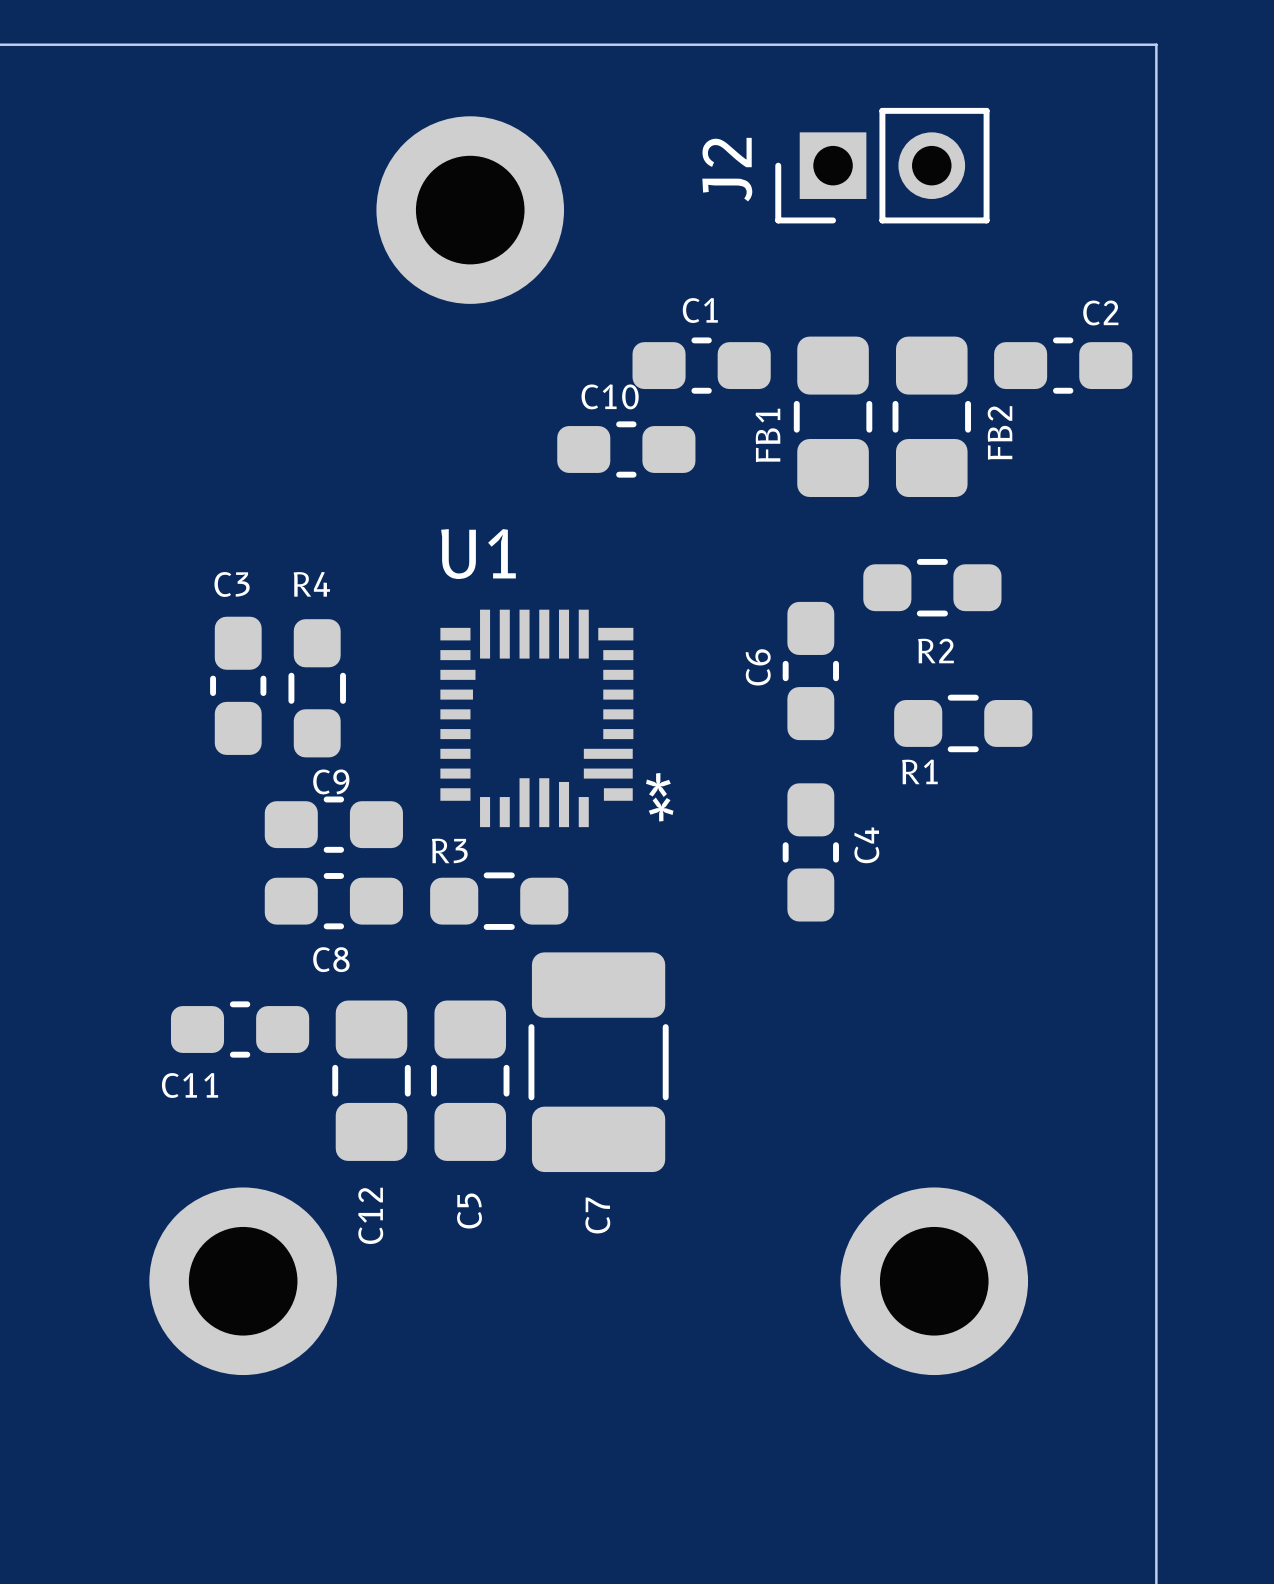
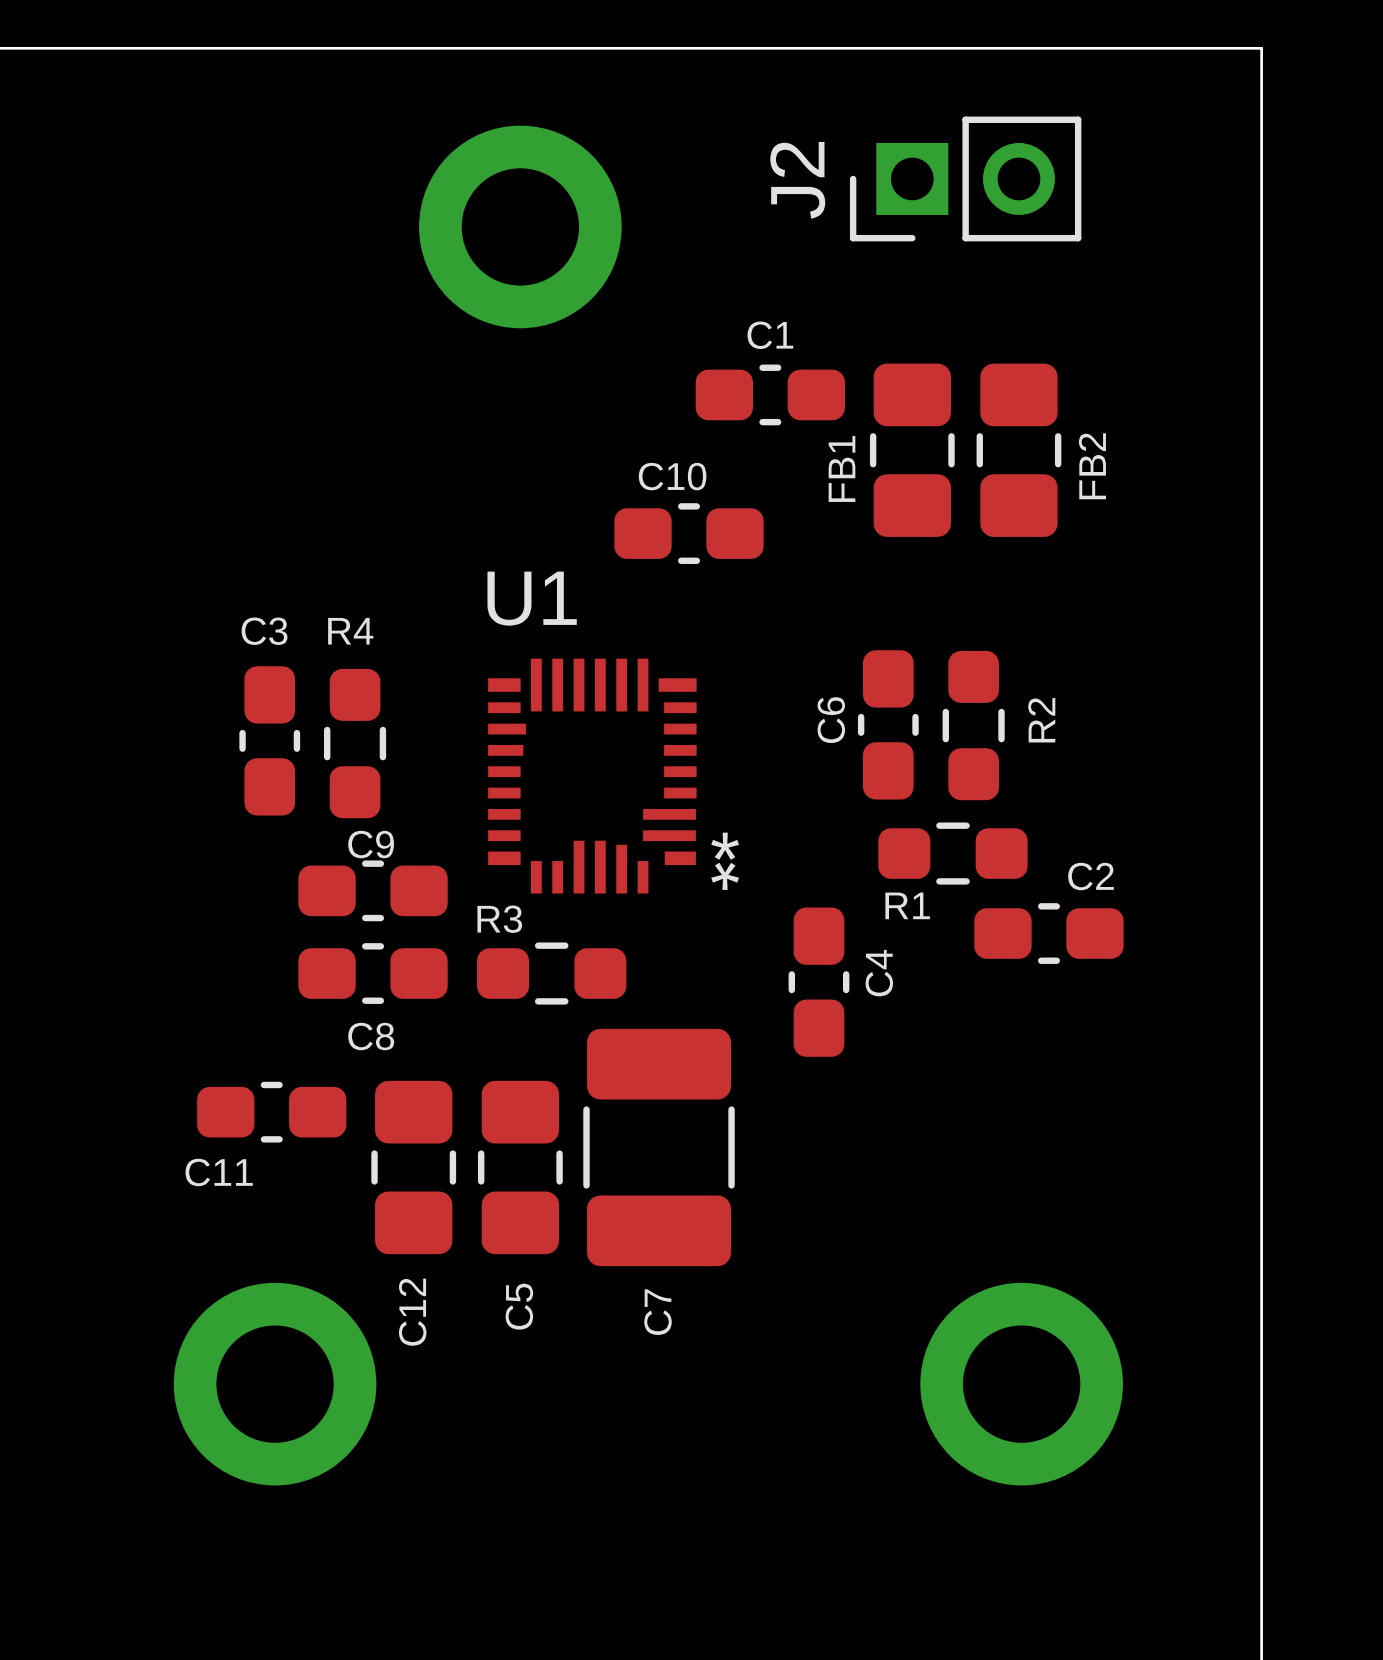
C2 position: (1063, 365) -> (1048, 933)
C10 position: (626, 449) -> (689, 533)
R2 rotation: 0° (932, 587) -> 90° clockwise (973, 725)
R2 position: (932, 587) -> (973, 725)
R1 position: (963, 723) -> (952, 853)
C4 position: (810, 852) -> (819, 982)

